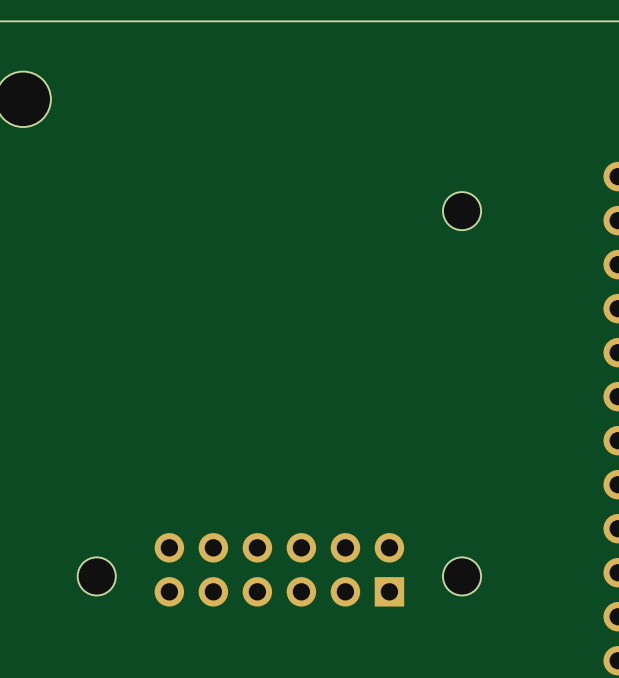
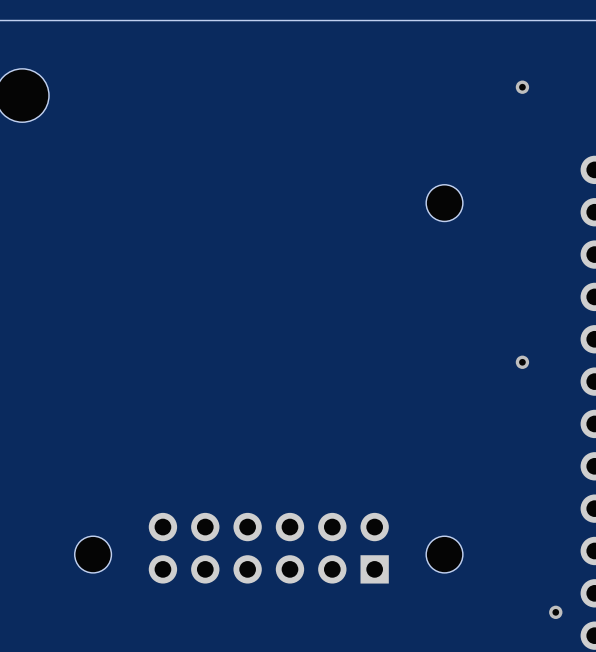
via: none -> (522, 87)
via: none -> (522, 362)
via: none -> (555, 612)

